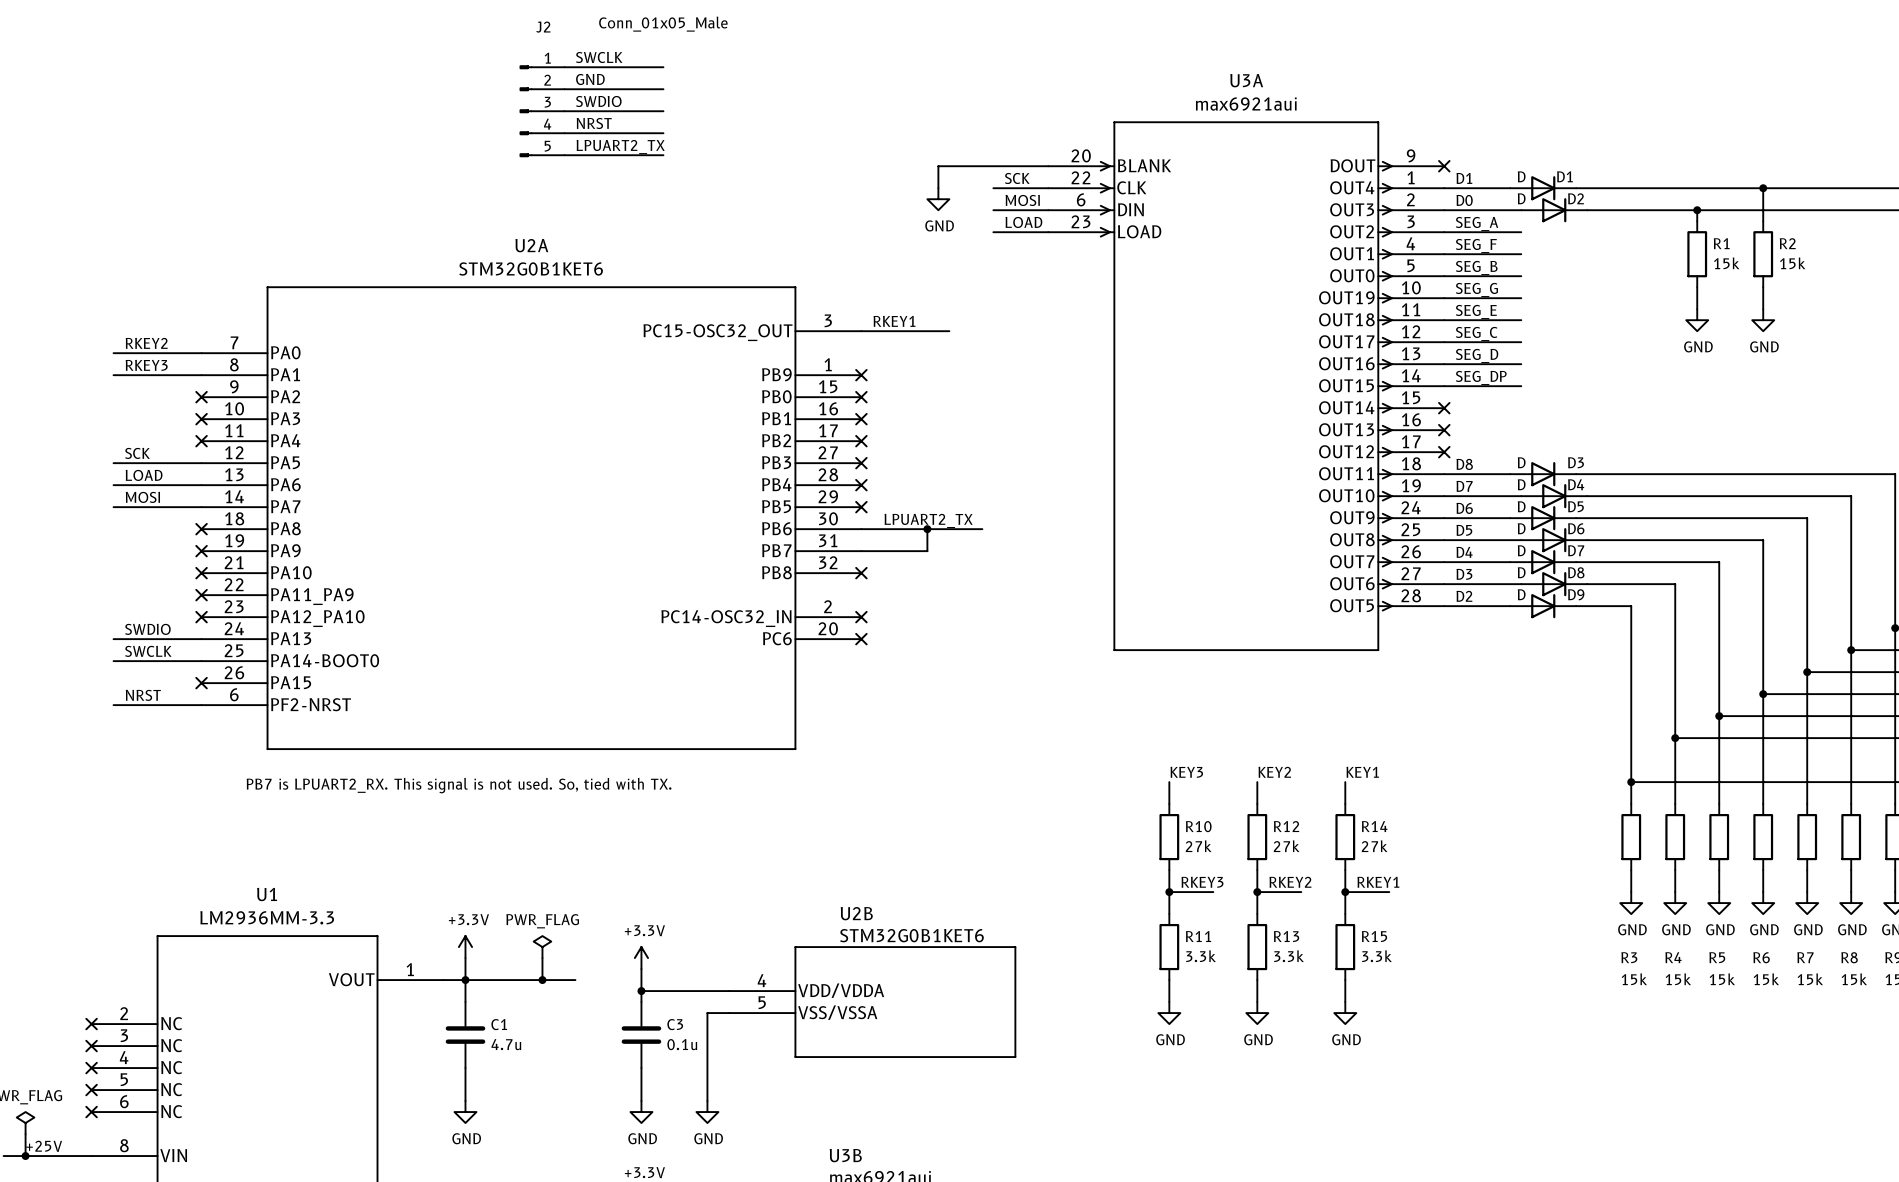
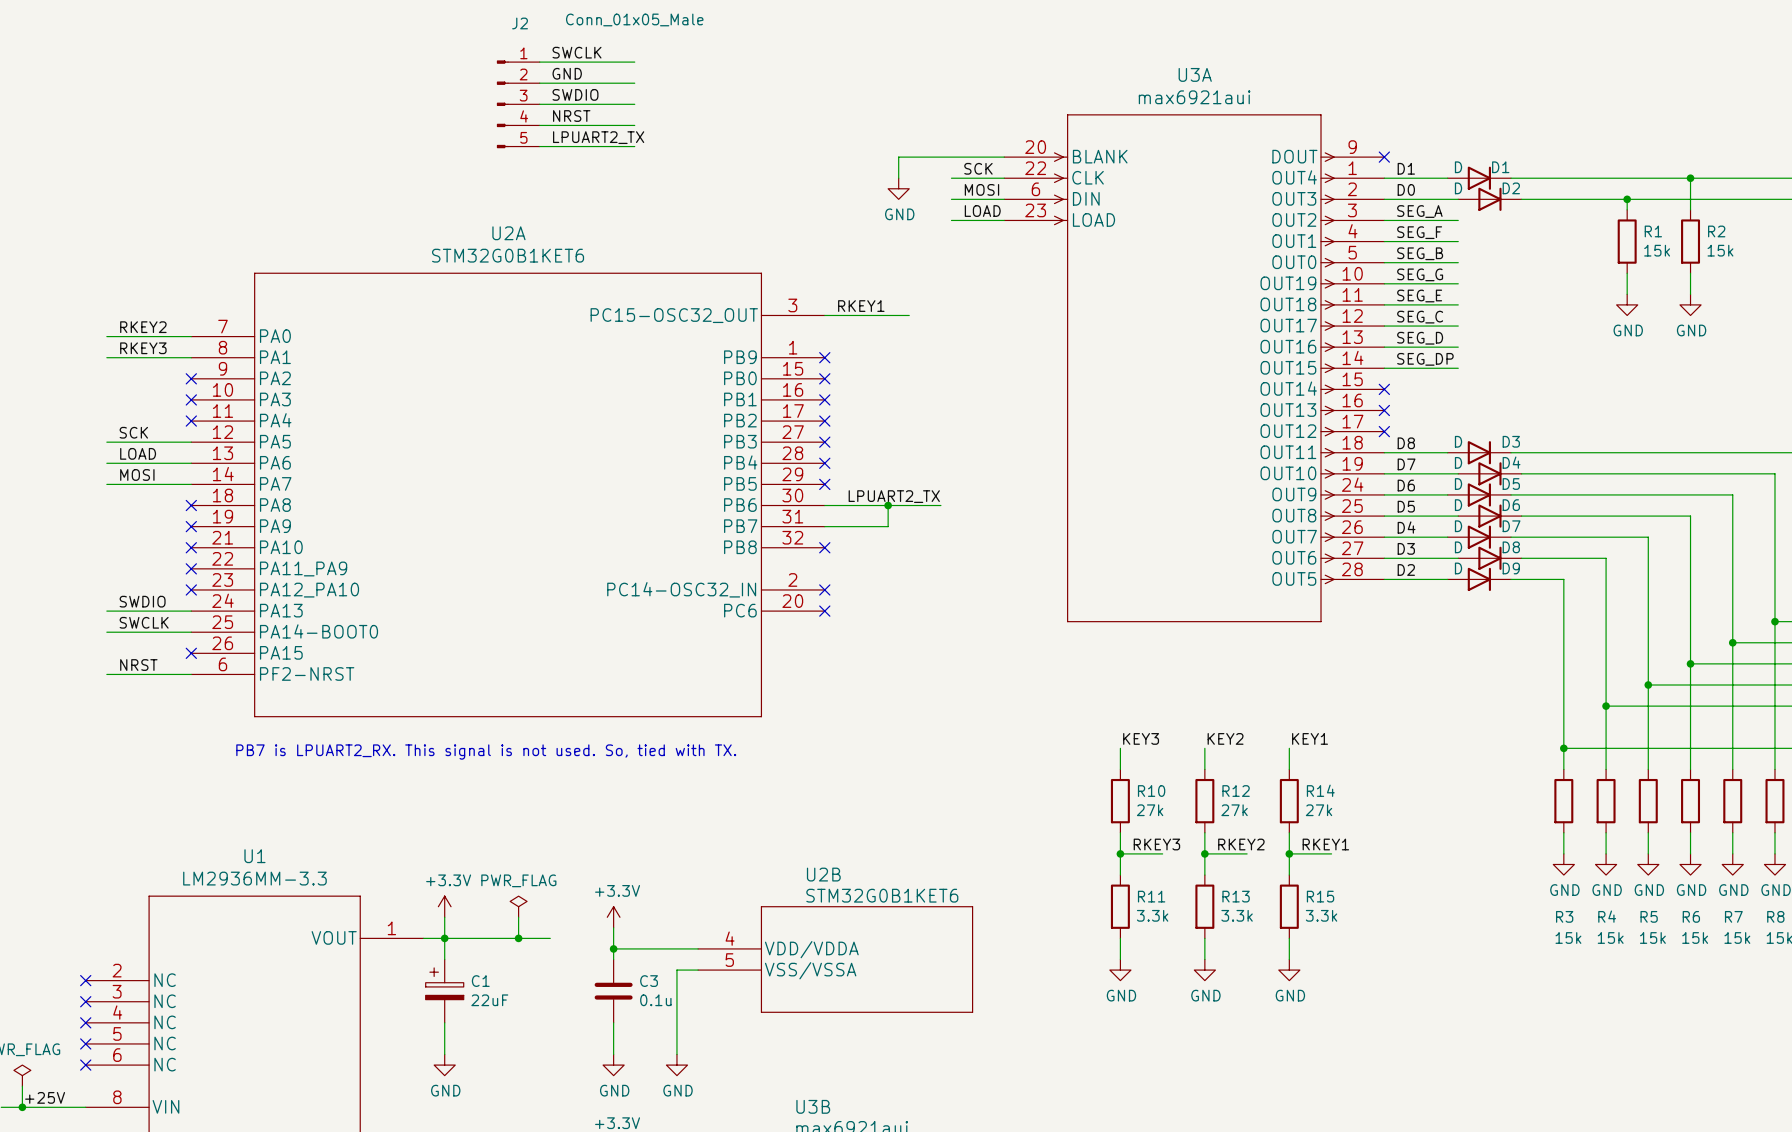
C1 symbol: [445, 1002, 486, 1069] -> [425, 959, 464, 1023]
C1 value: 4.7u (506, 1044) -> 22uF (489, 1000)

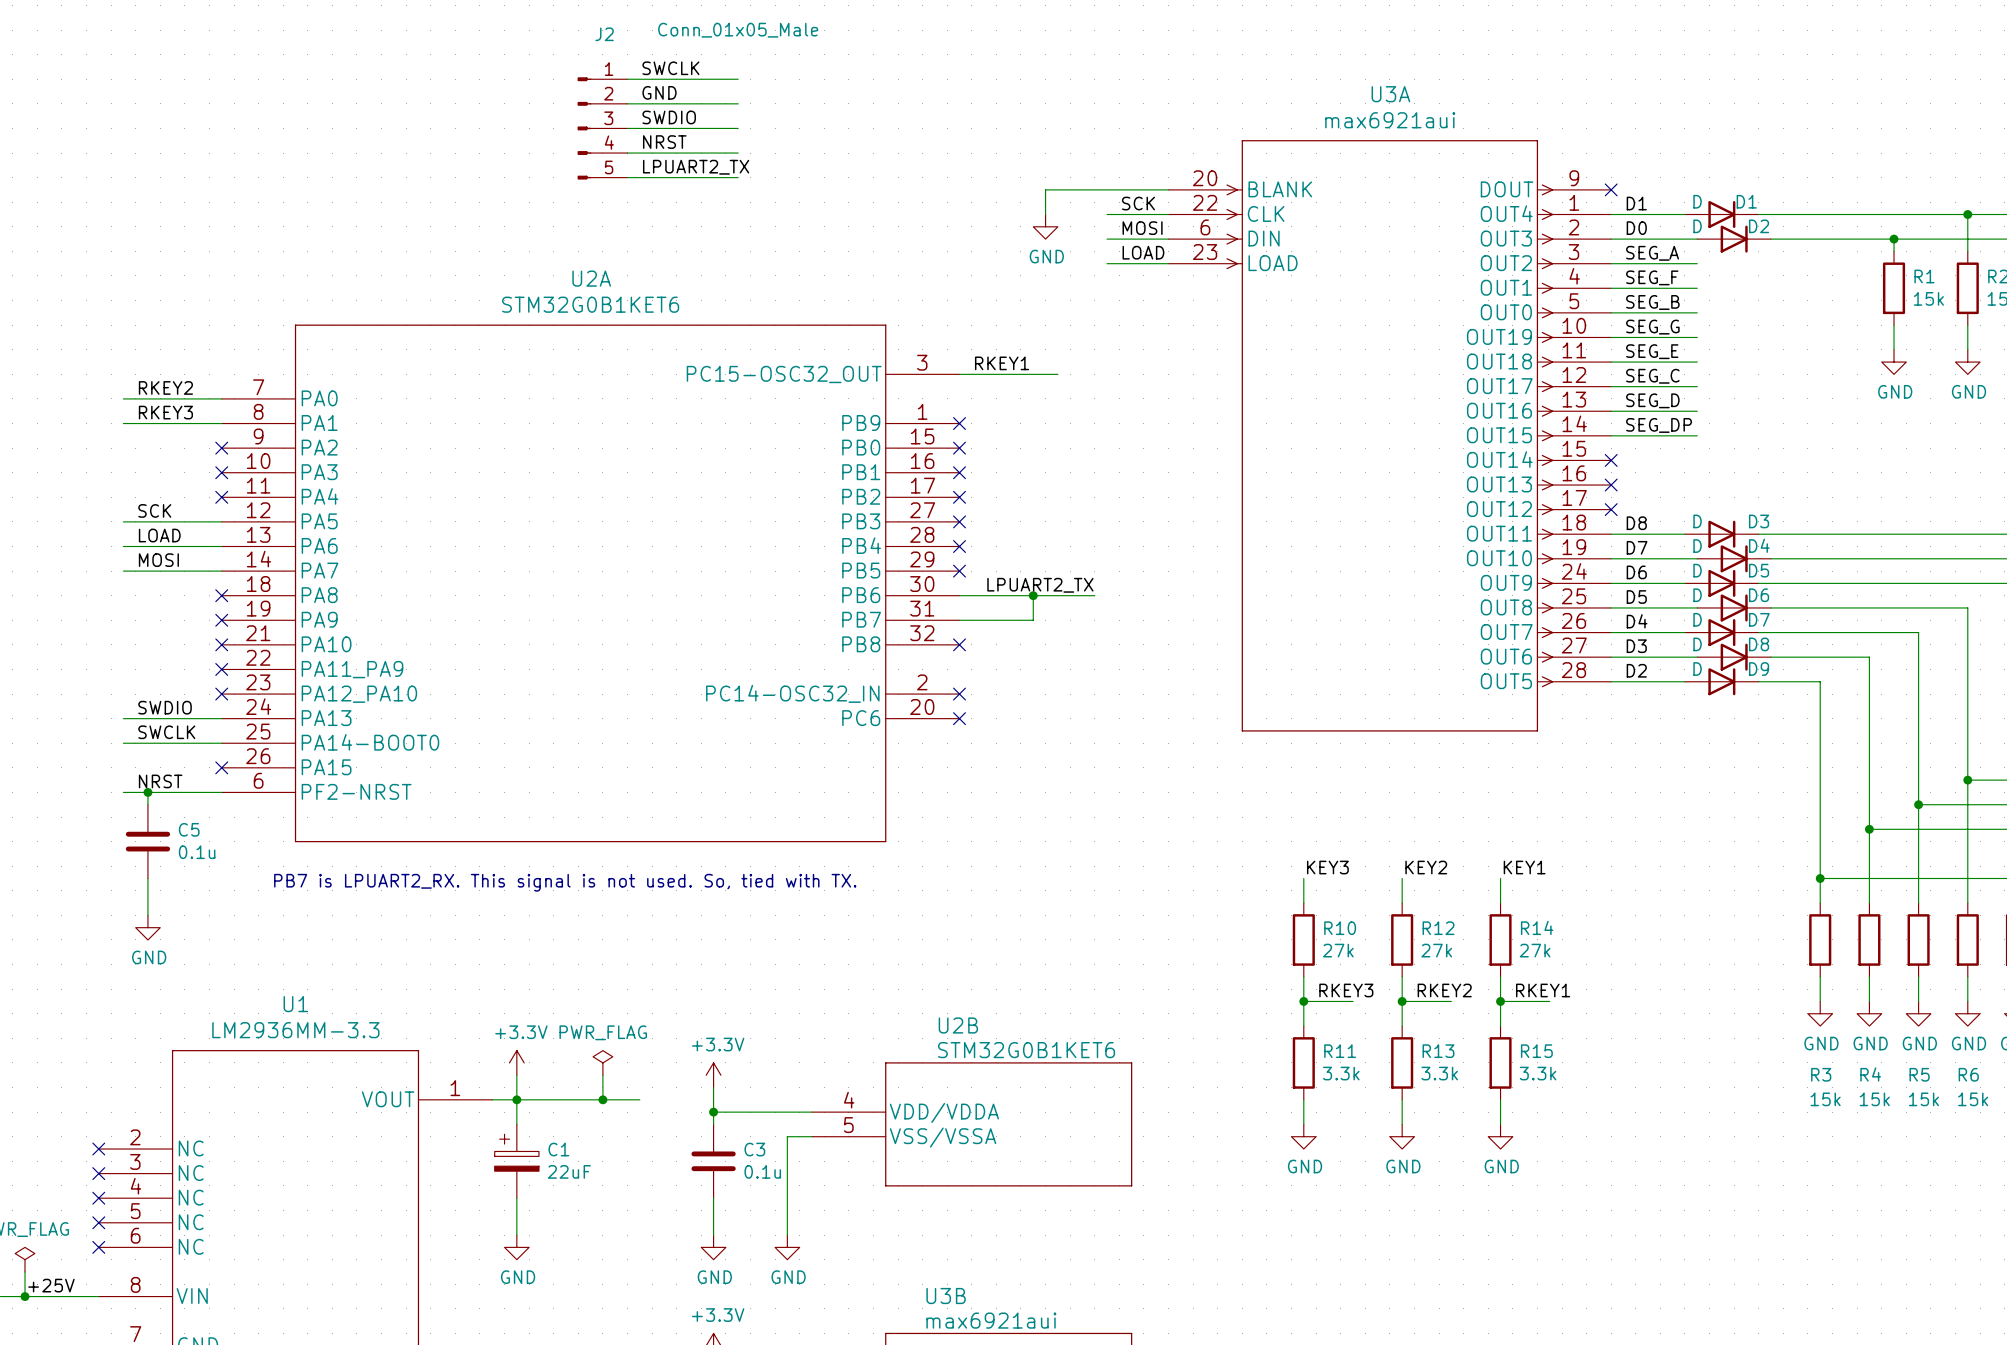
wire: none -> (147, 792) (147, 804)
junction: none -> (147, 792)
C5: none -> 0.1u (147, 841)
wire: none -> (147, 878) (147, 915)
power symbol: none -> GND (147, 927)

